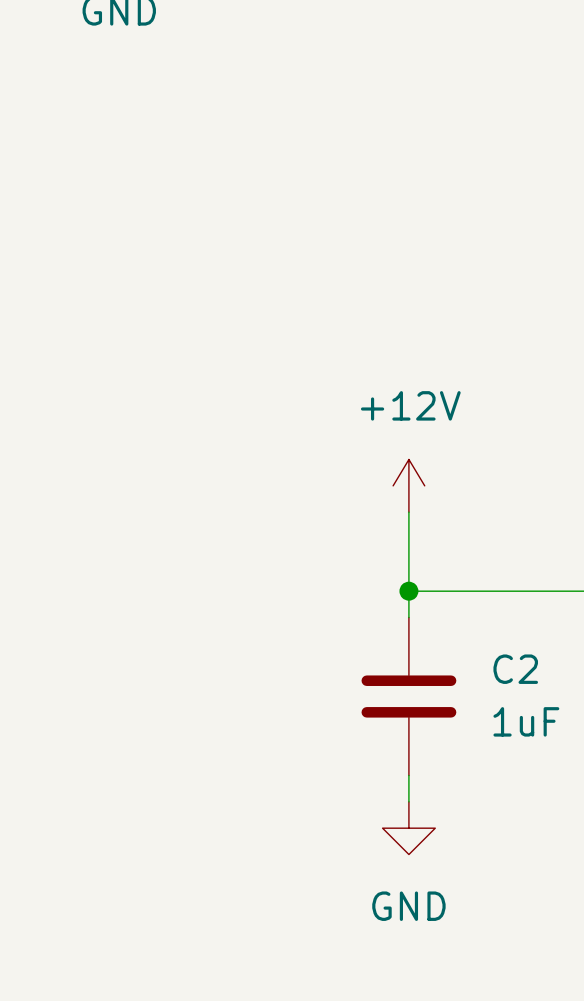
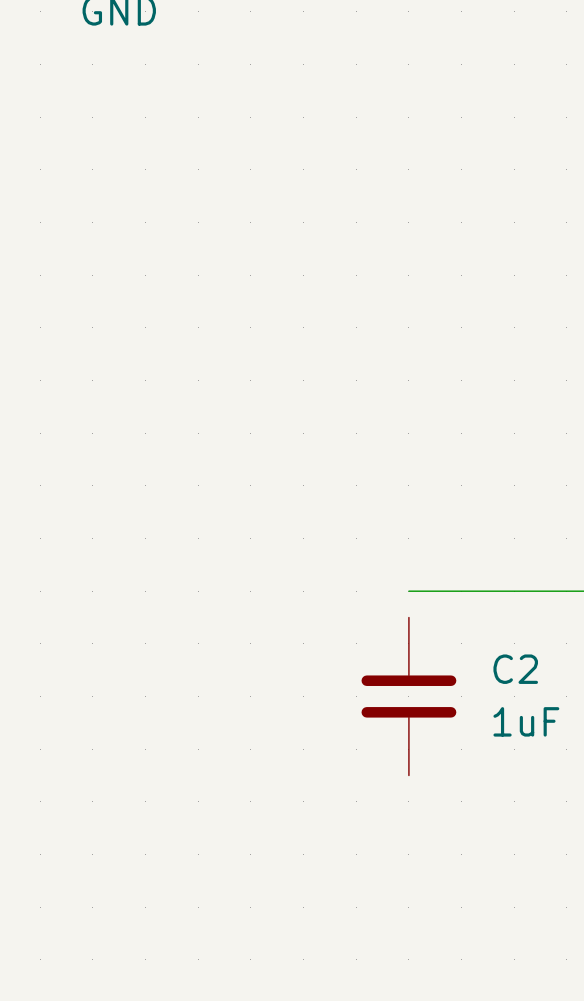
power symbol: +12V (408, 485) -> none
wire: (408, 512) (408, 617) -> none
junction: (408, 591) -> none
wire: (408, 775) (408, 801) -> none
power symbol: GND (408, 828) -> none

